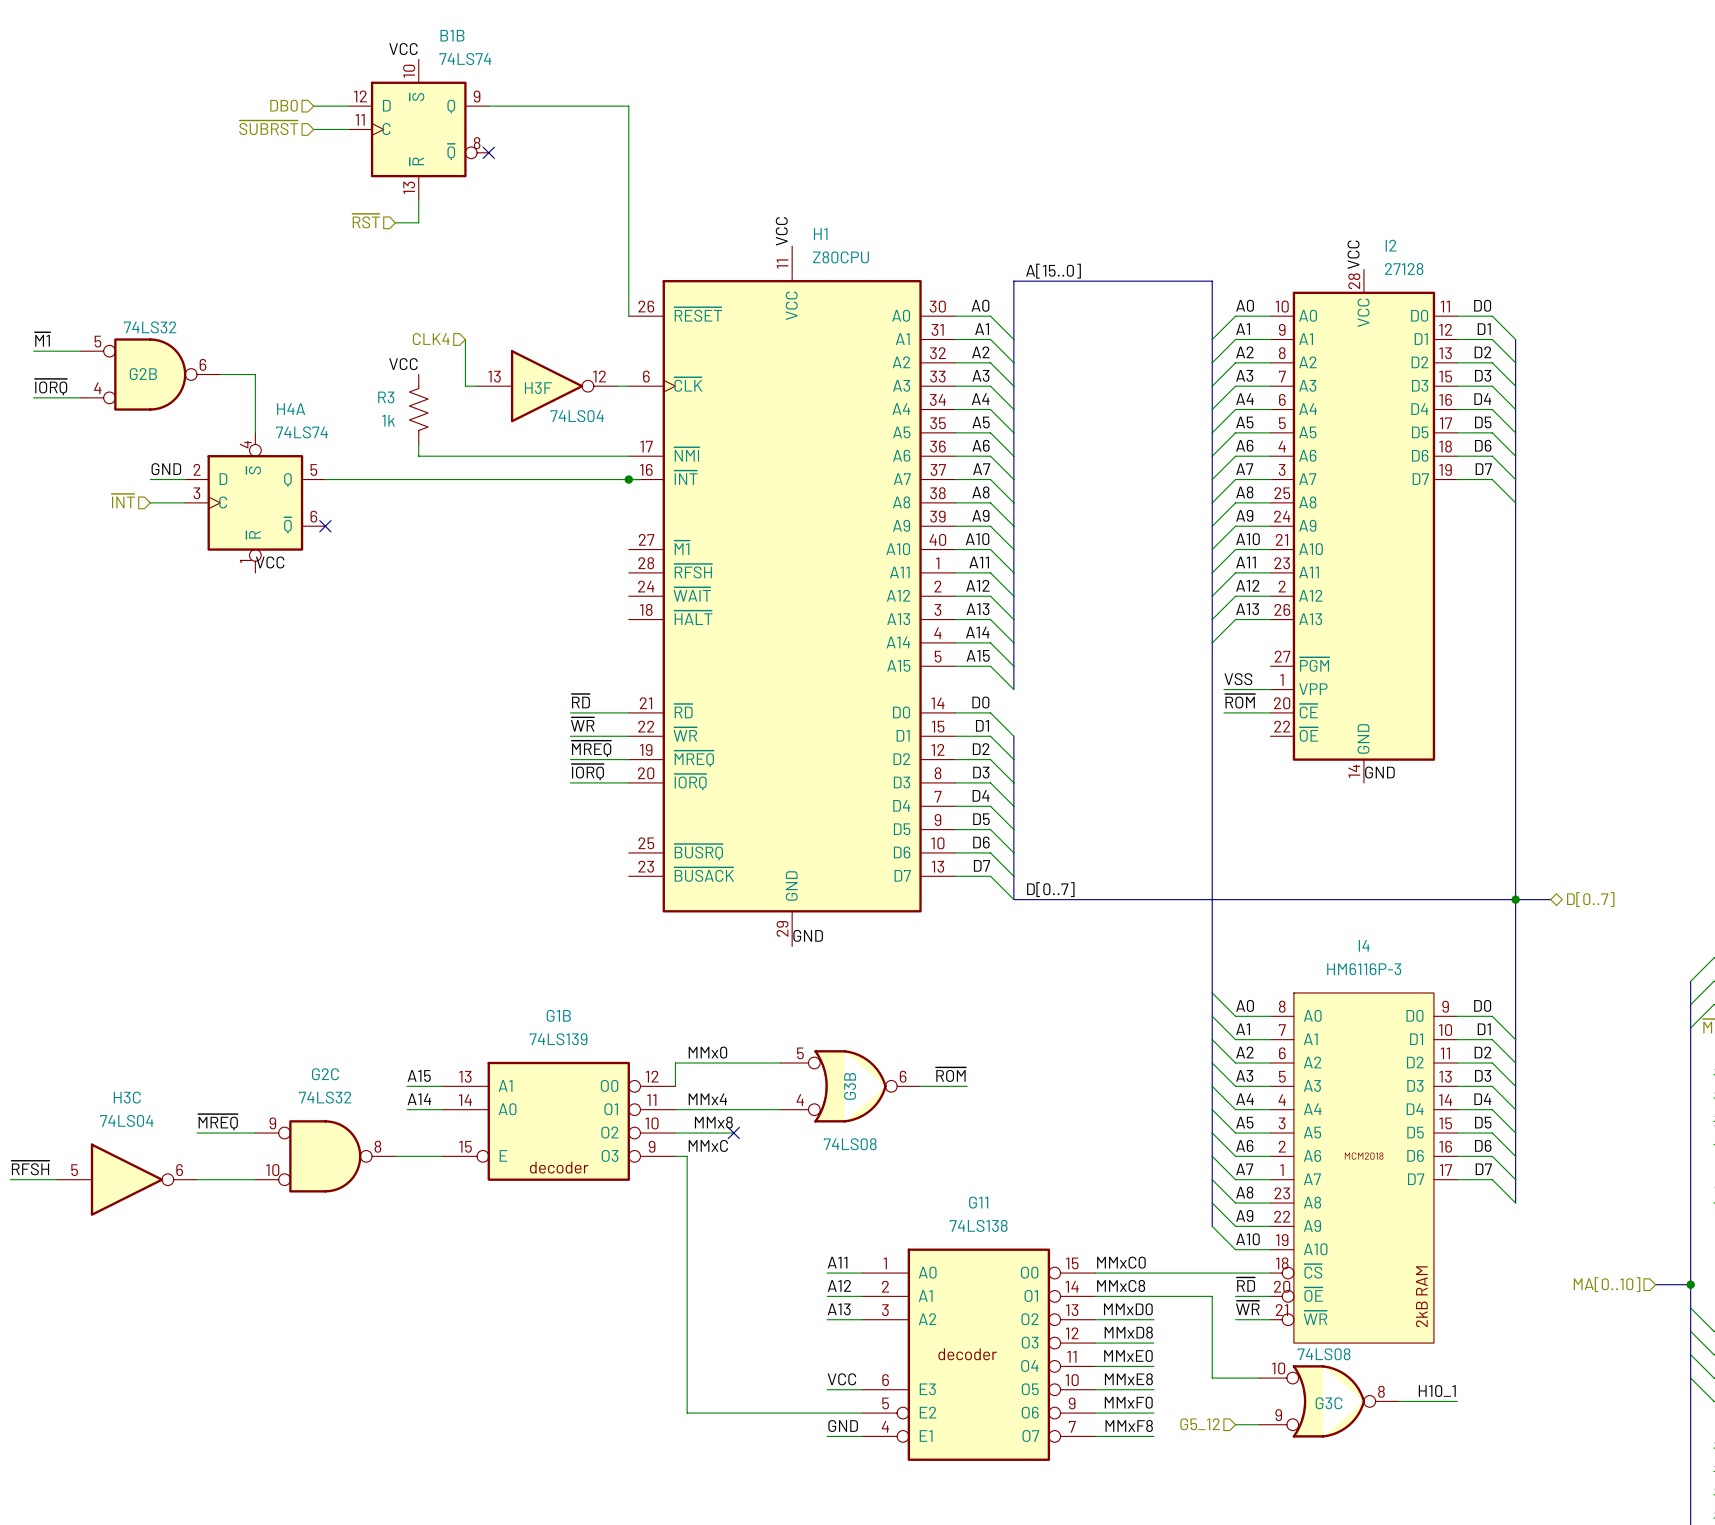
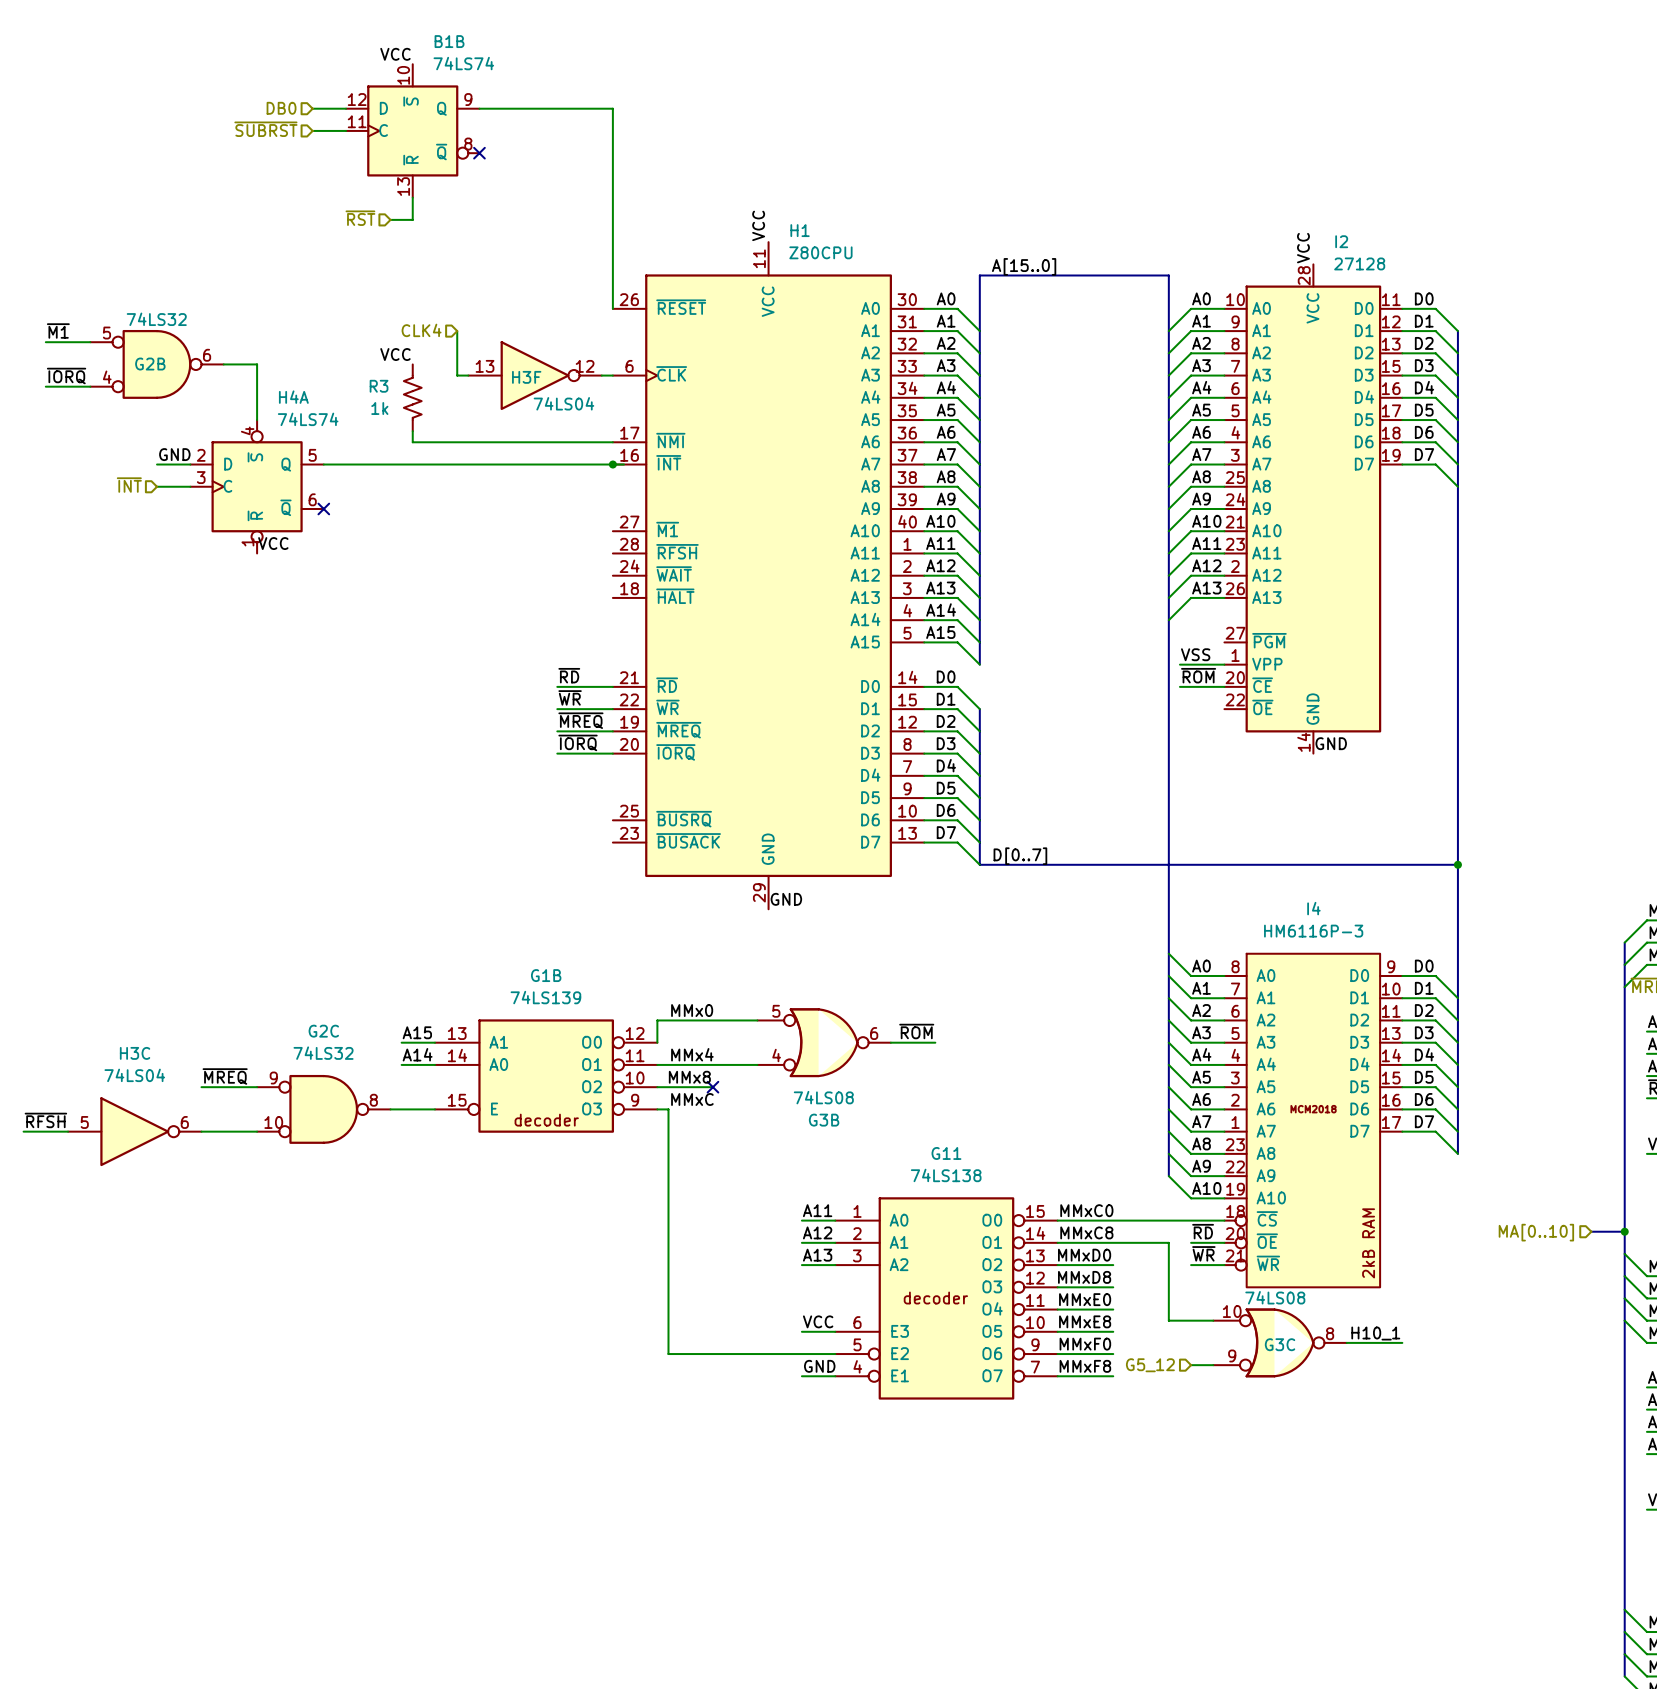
bus: (1515, 899) (1550, 899) -> none
hierarchical label: D[0..7] (1590, 899) -> none
G3B name rotation: 0° (850, 1086) -> 90° clockwise (824, 1120)
G3B name position: G3B (850, 1086) -> G3B (824, 1120)

